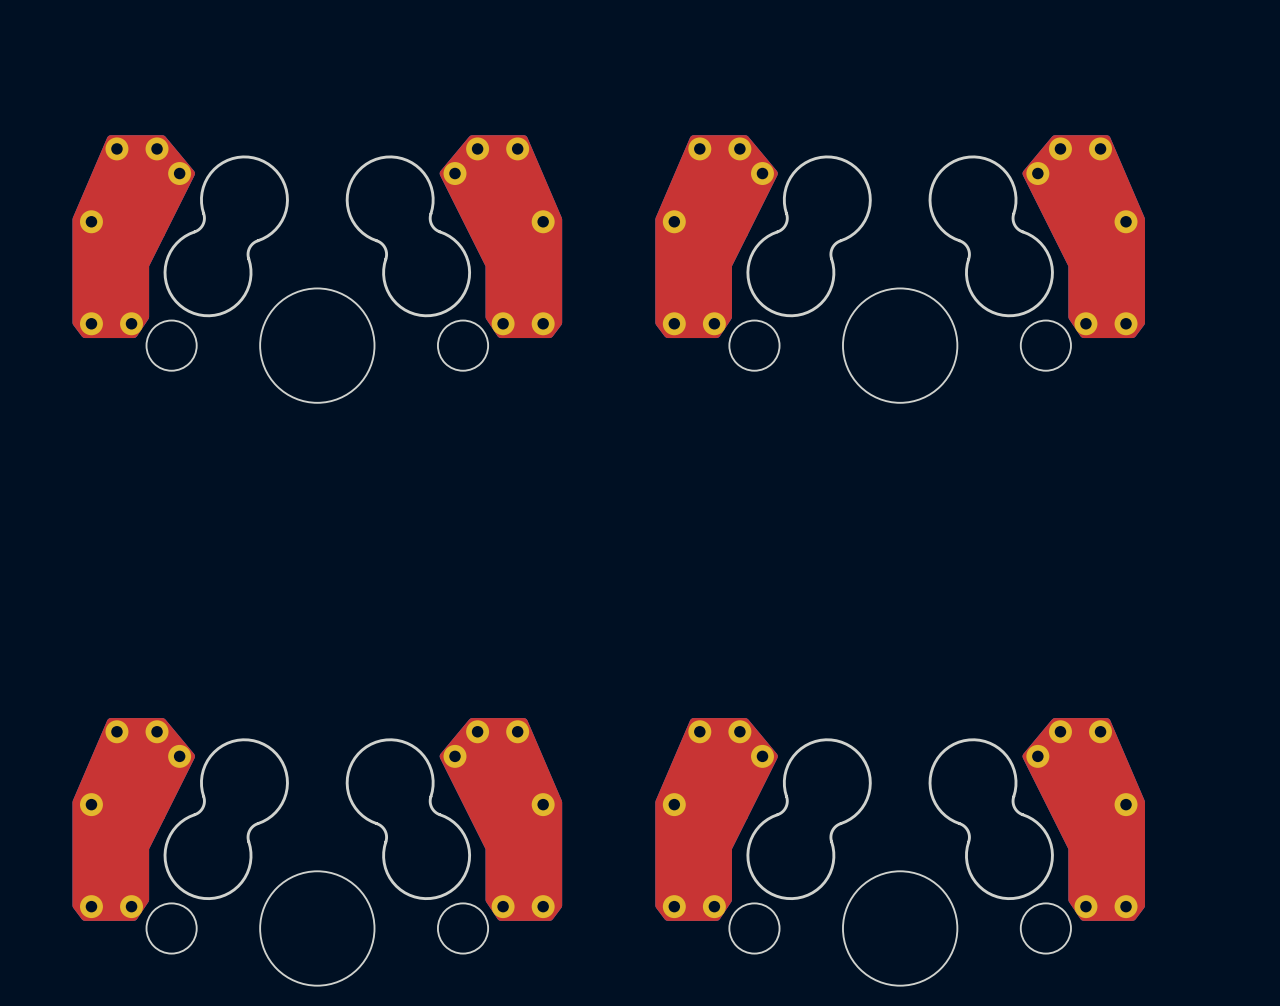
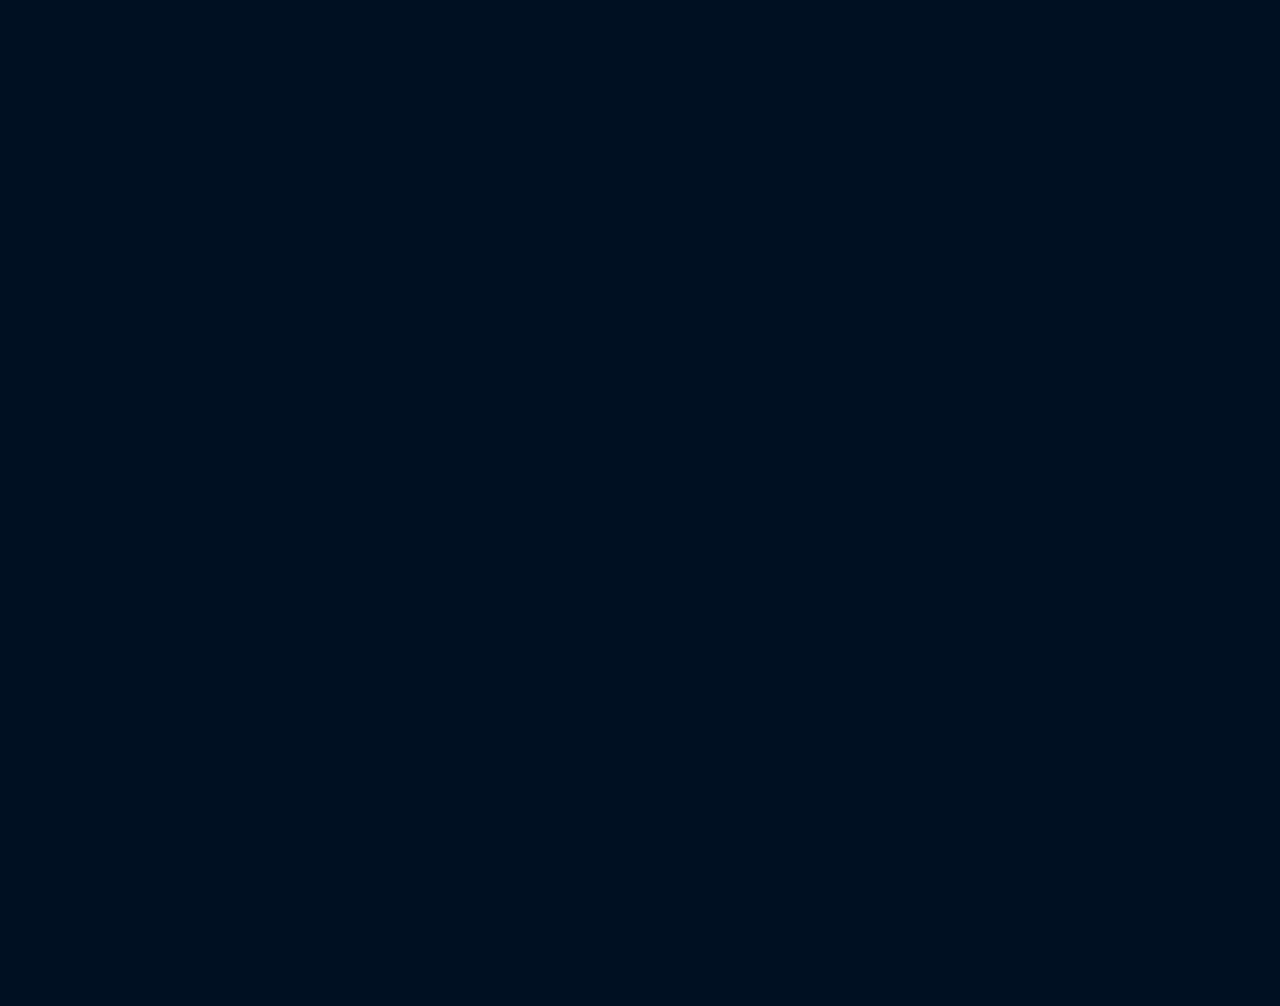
part: (317, 269) -> none
part: (900, 269) -> none
part: (317, 851) -> none
part: (900, 851) -> none

